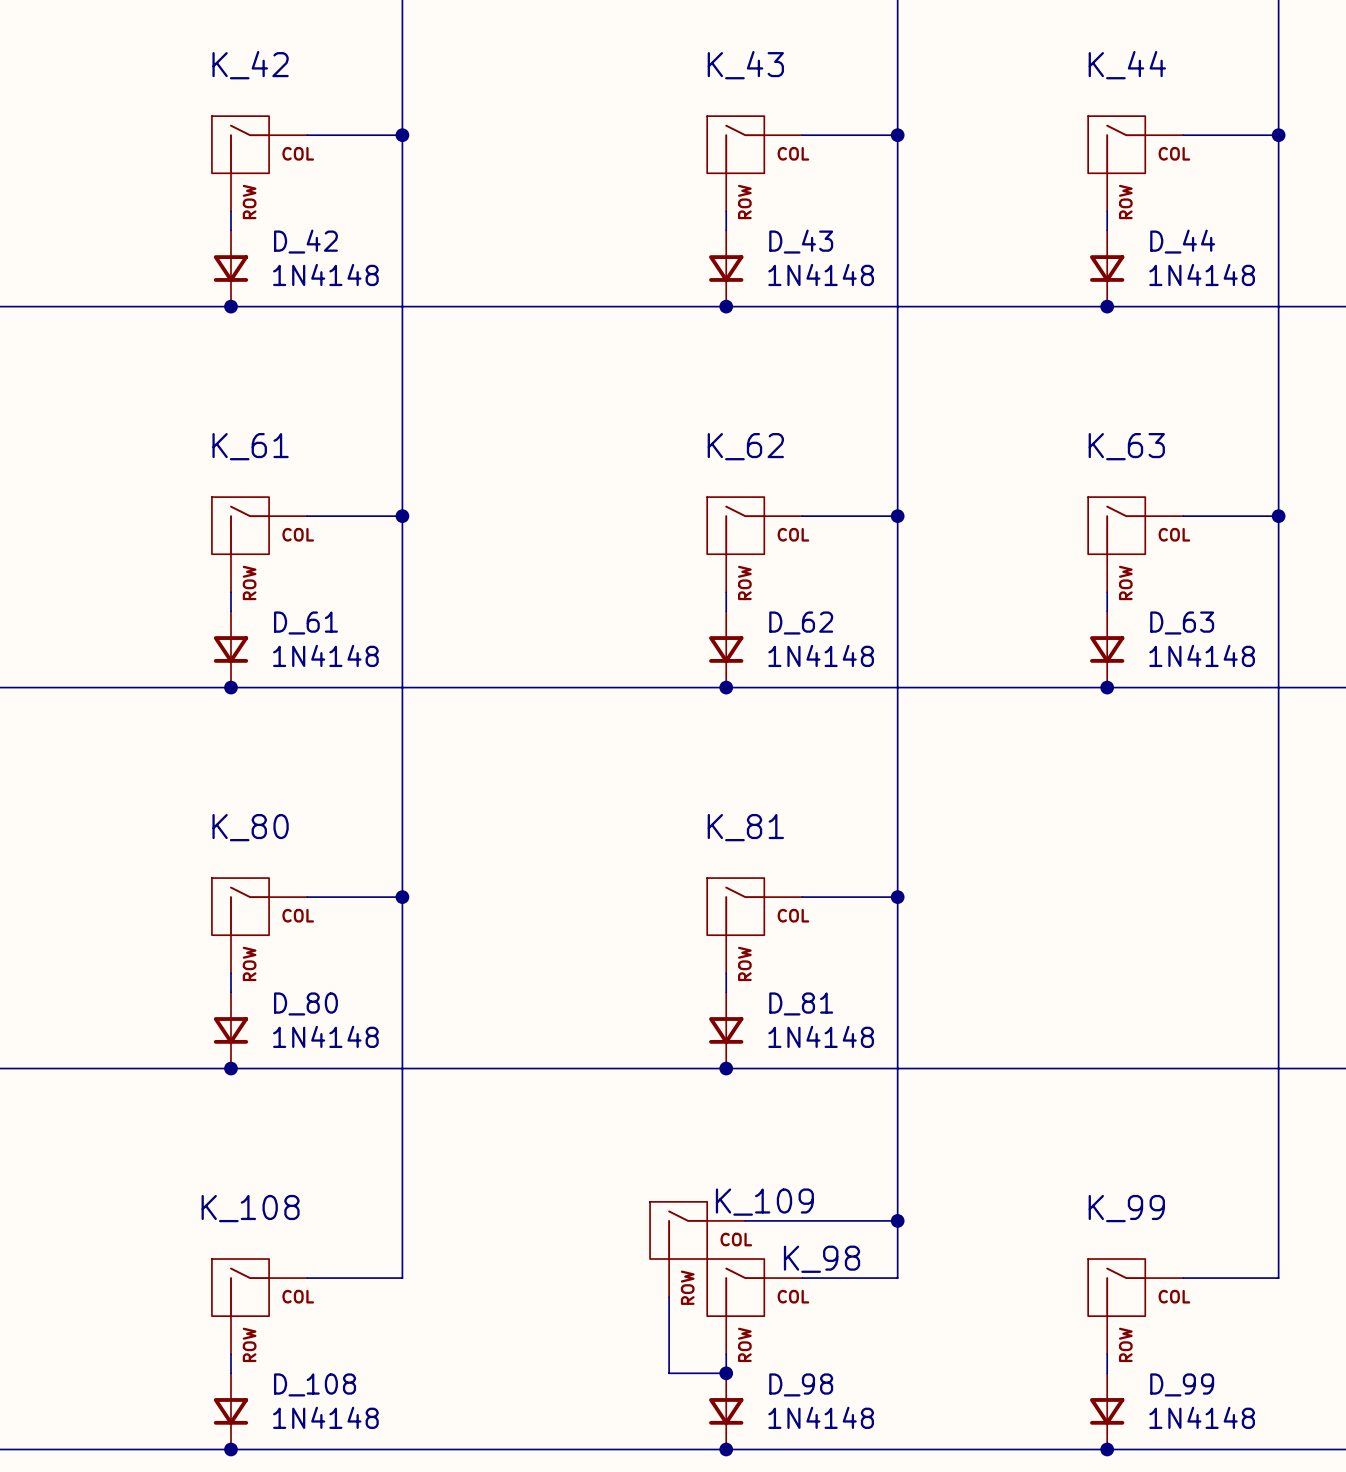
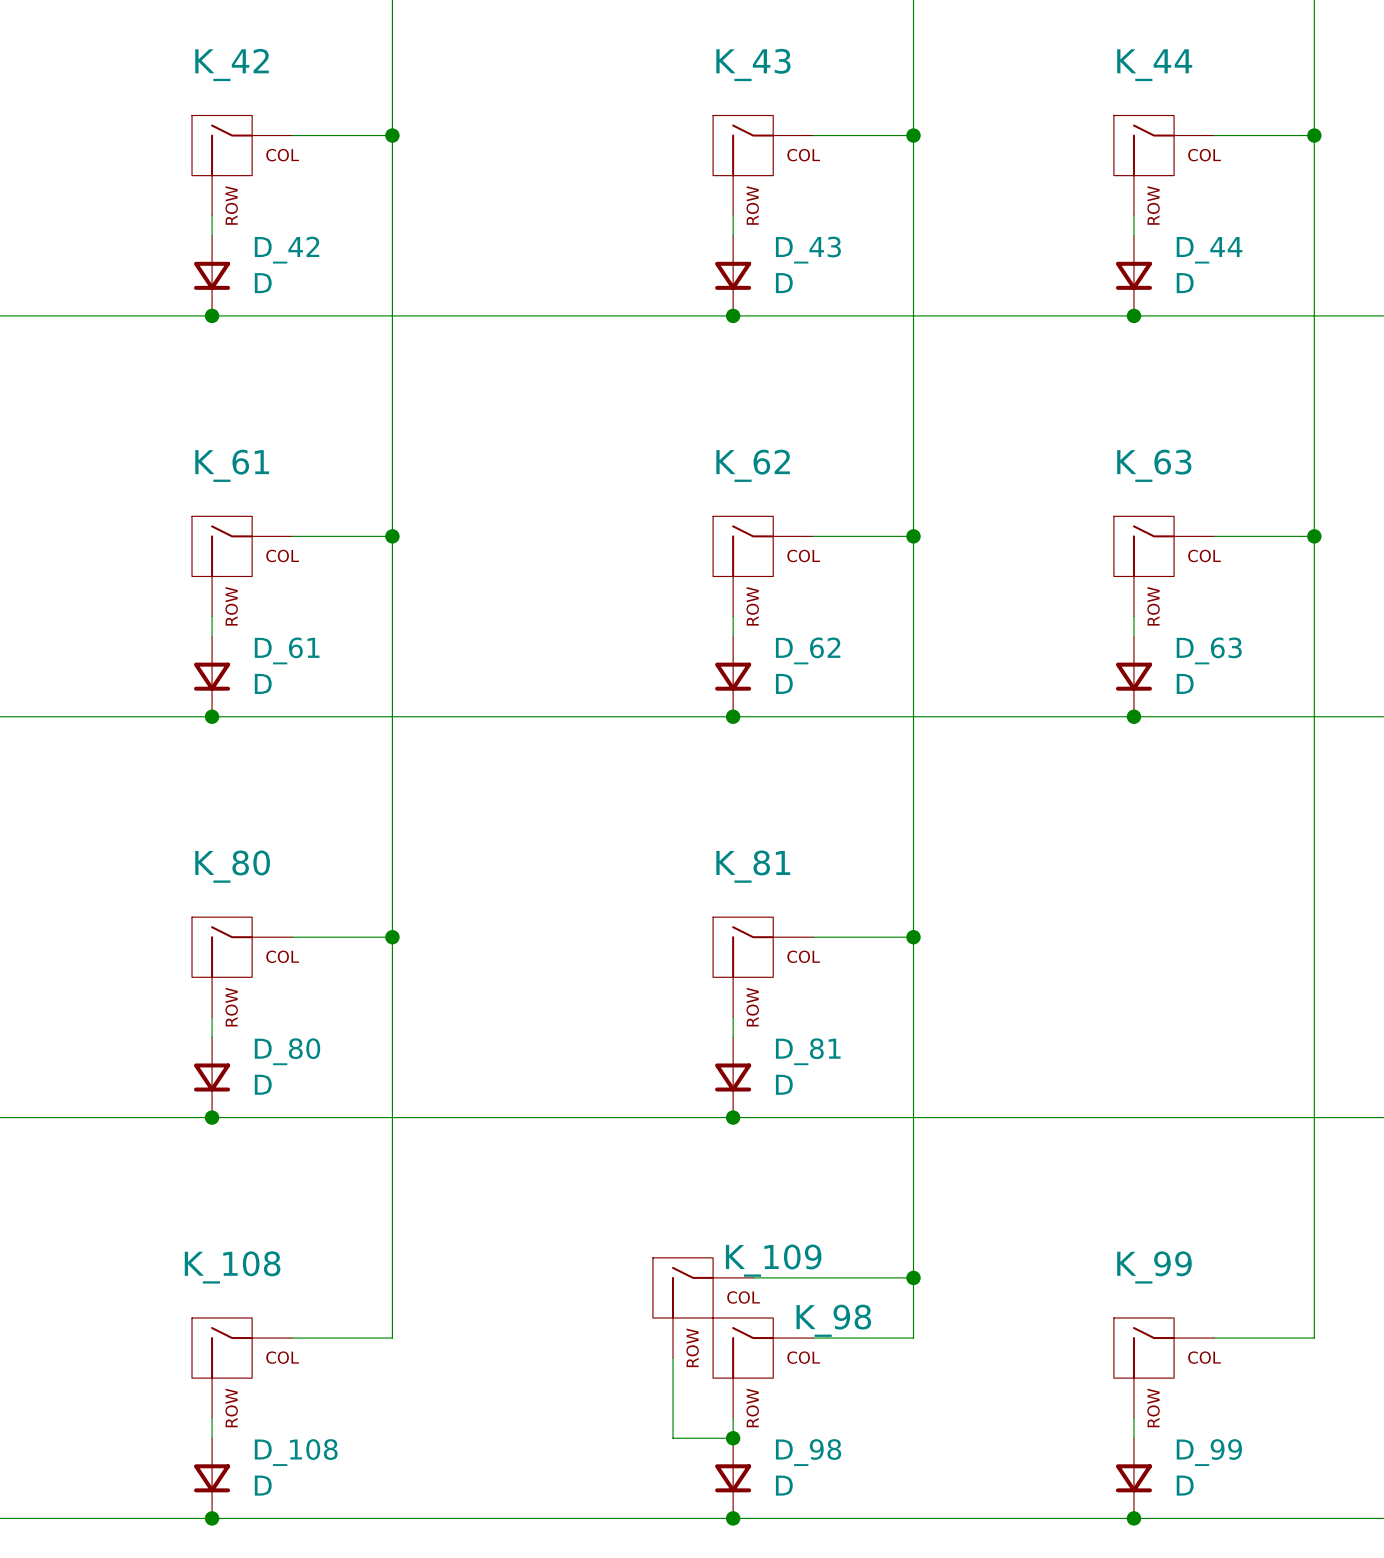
D_42 value: 1N4148 (325, 274) -> D (263, 283)
D_43 value: 1N4148 (821, 274) -> D (784, 283)
D_44 value: 1N4148 (1202, 274) -> D (1185, 283)
D_61 value: 1N4148 (325, 655) -> D (263, 683)
D_62 value: 1N4148 (821, 655) -> D (784, 683)
D_63 value: 1N4148 (1202, 655) -> D (1185, 683)
D_80 value: 1N4148 (325, 1036) -> D (263, 1084)
D_81 value: 1N4148 (821, 1036) -> D (784, 1084)
D_108 value: 1N4148 (325, 1417) -> D (263, 1485)
D_98 value: 1N4148 (821, 1417) -> D (784, 1485)
D_99 value: 1N4148 (1202, 1417) -> D (1185, 1485)

